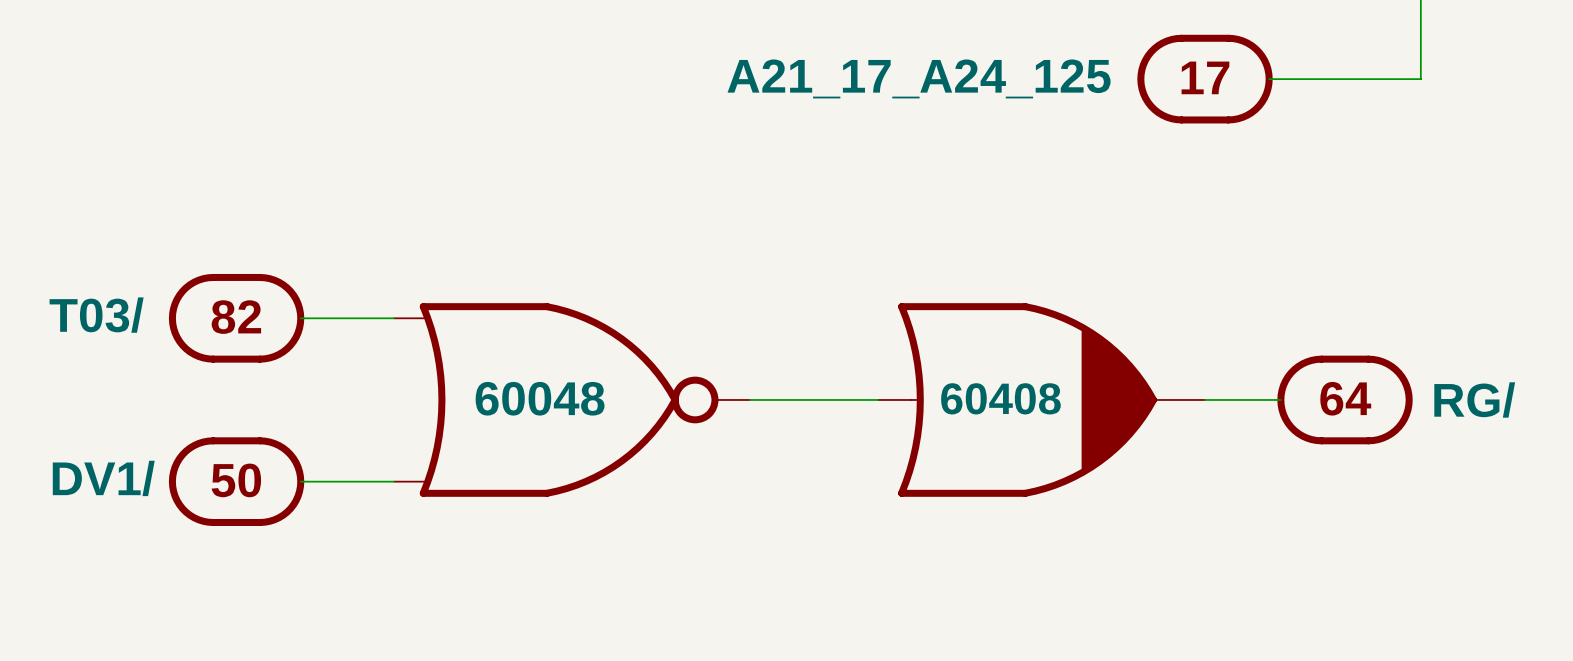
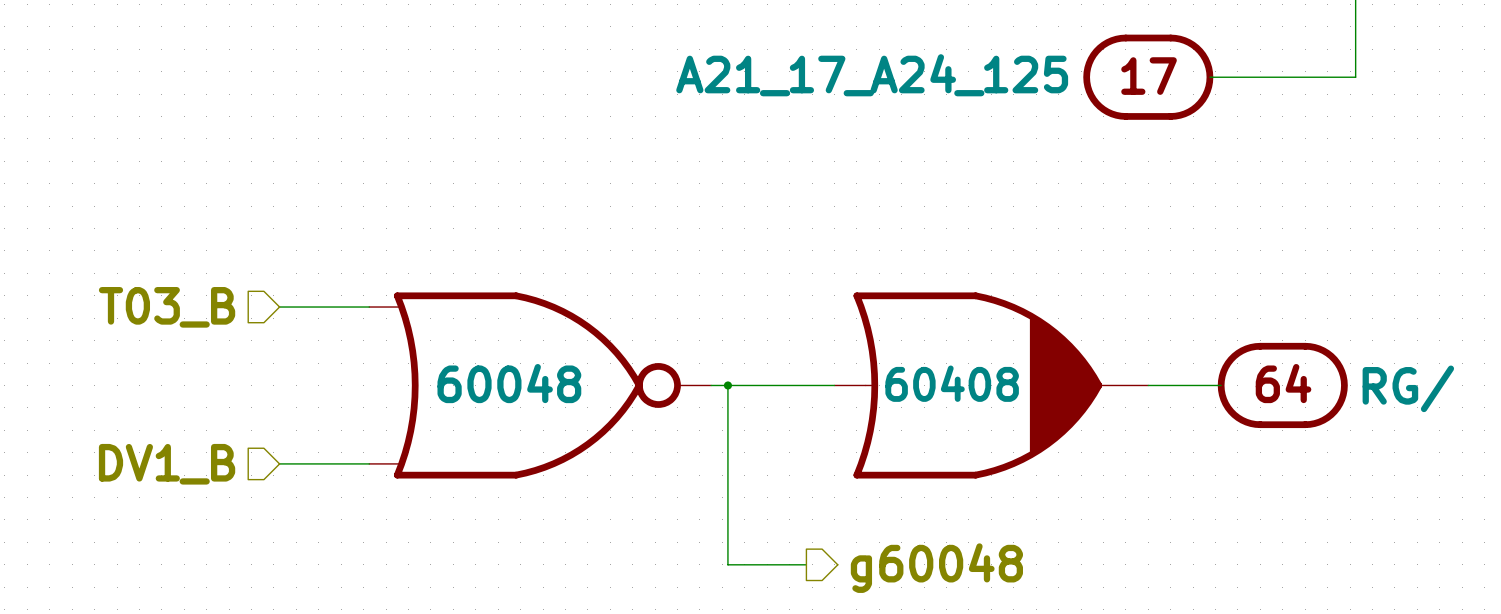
part: (236, 318) -> none
hierarchical label: none -> T03_B (167, 307)
wire: none -> (727, 385) (727, 564) (806, 564)
junction: none -> (727, 385)
part: (236, 481) -> none
hierarchical label: none -> DV1_B (167, 464)
hierarchical label: none -> g60048 (936, 568)

